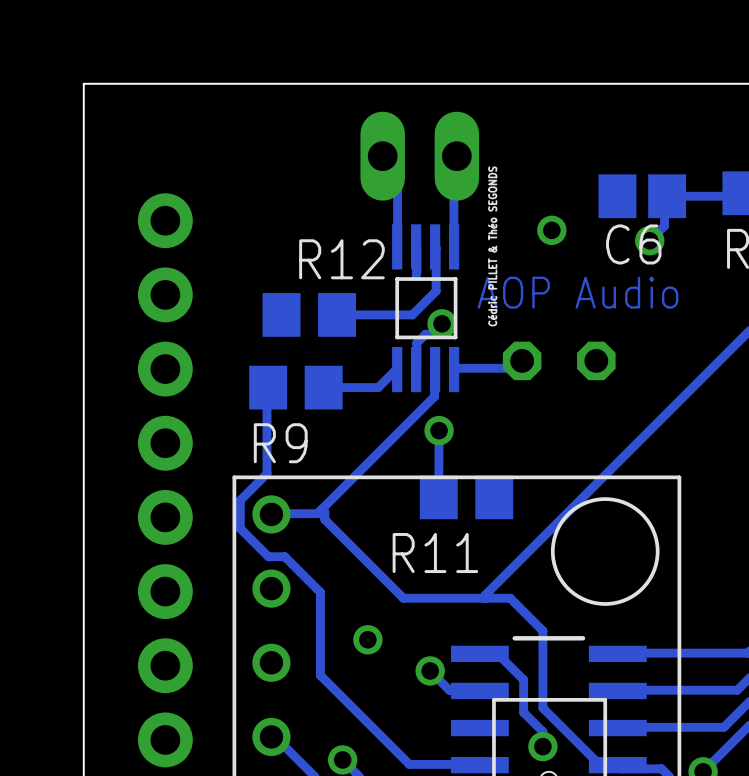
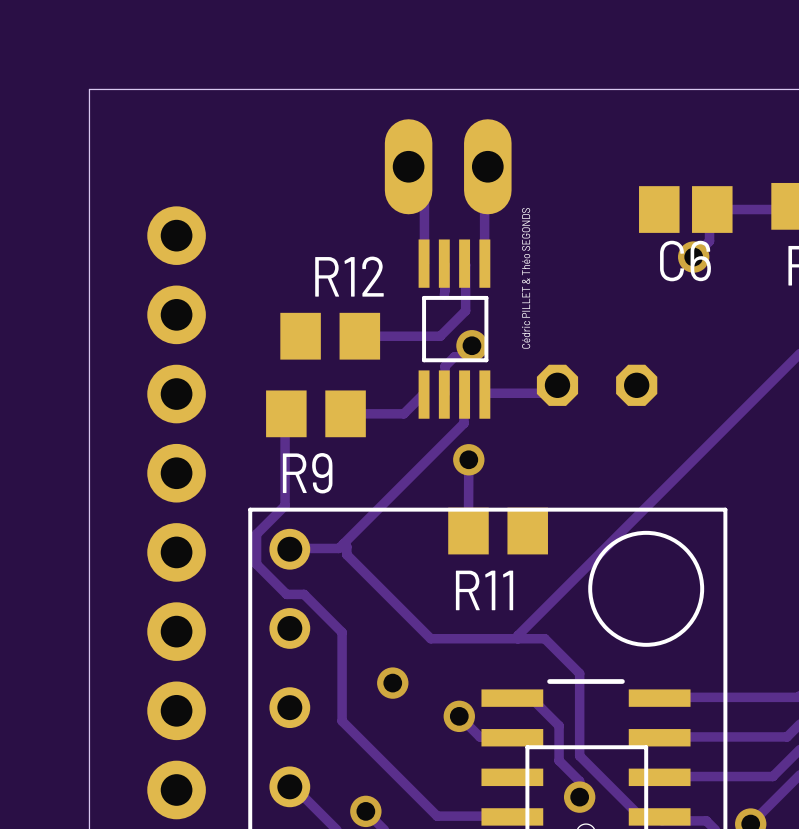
via: (551, 230) -> none
text: AOP Audio (577, 292) -> none

